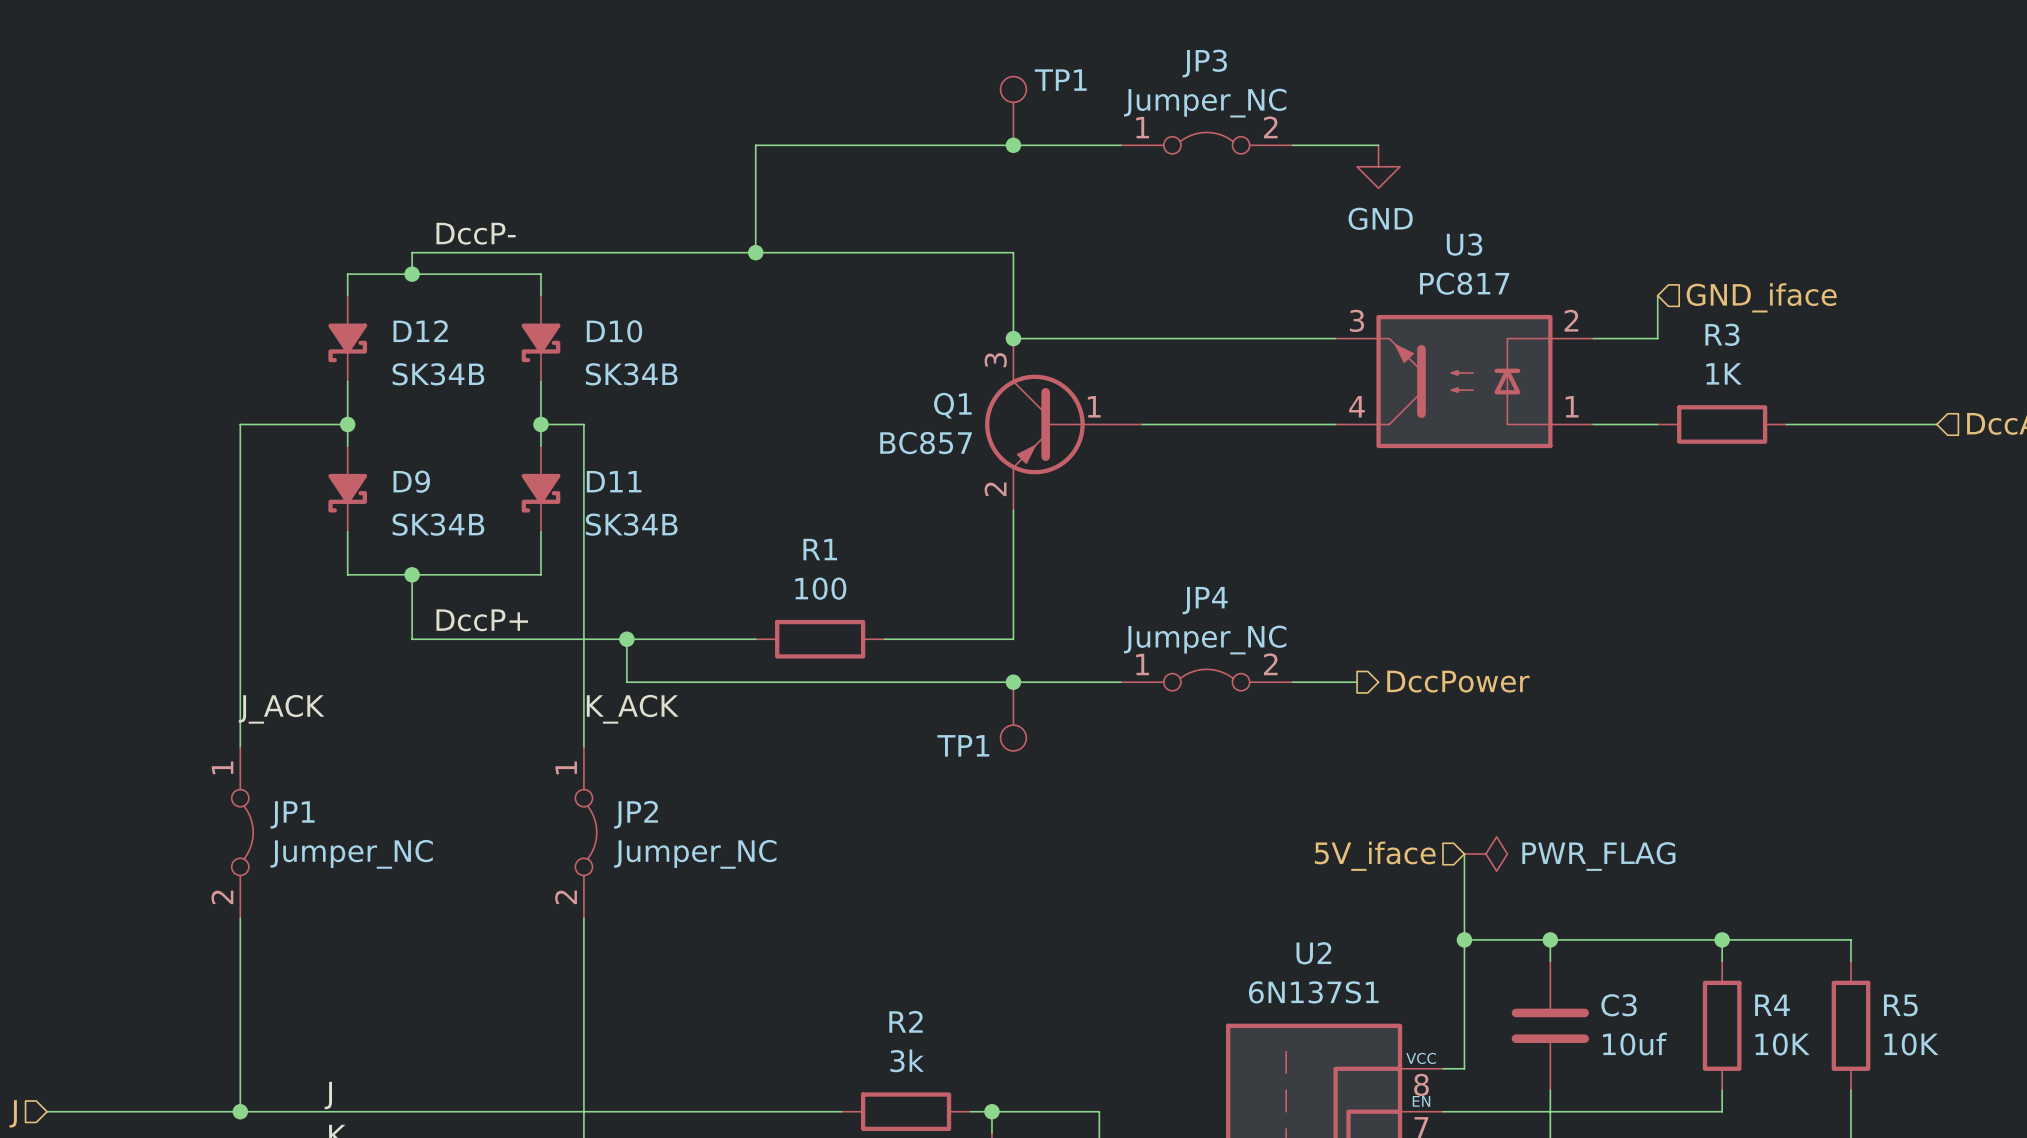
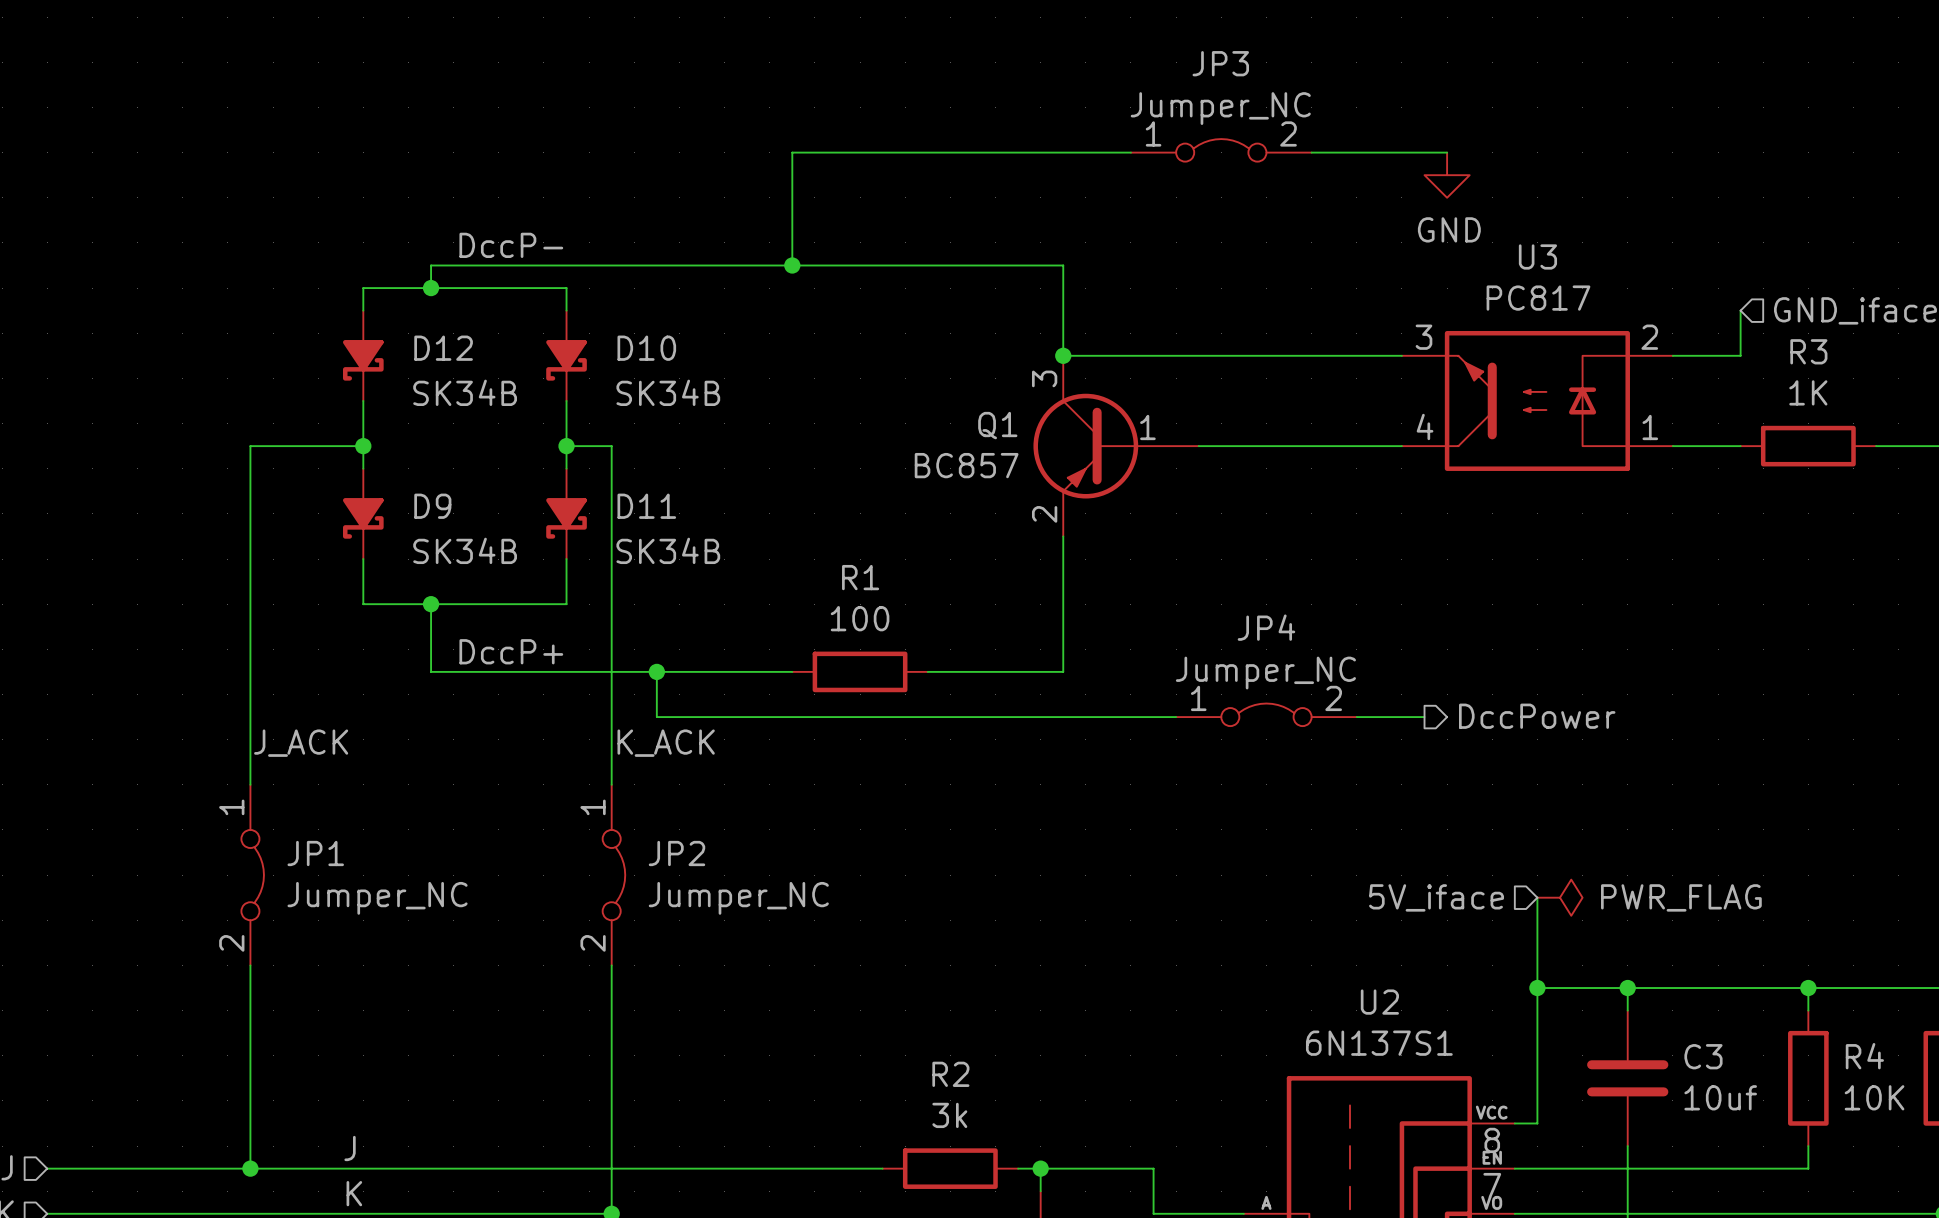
TP1: (1013, 110) -> none
JP3 position: (1206, 143) -> (1221, 150)
junction: (1013, 145) -> none
junction: (1013, 682) -> none
TP1: (1013, 716) -> none

